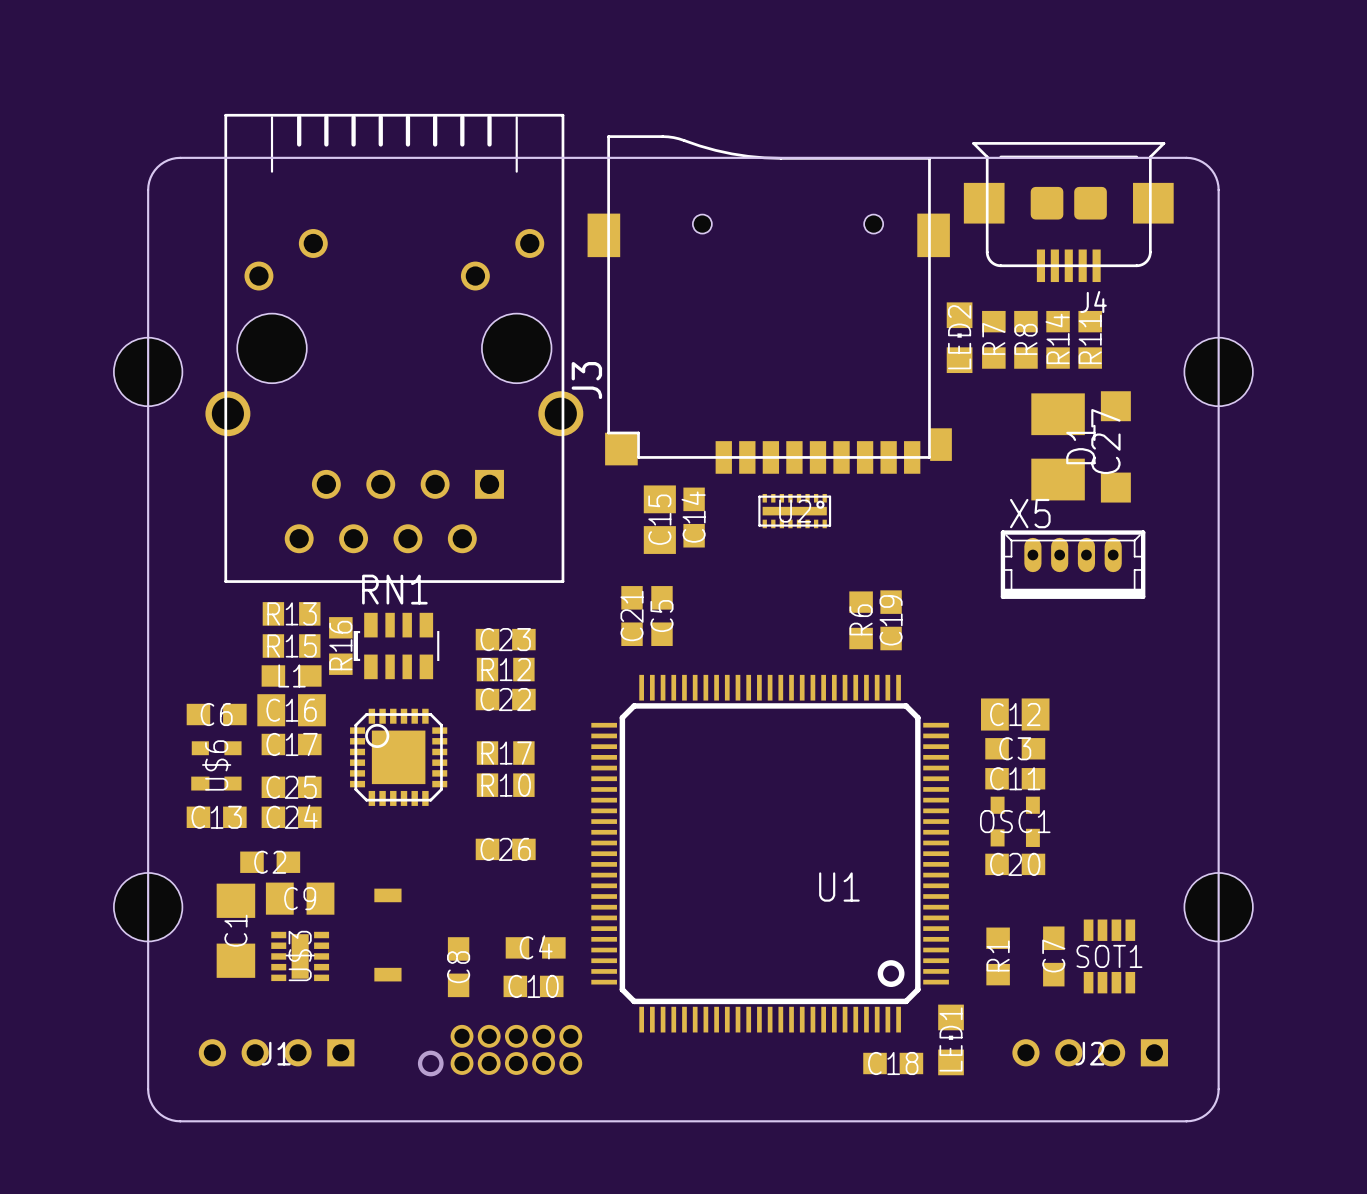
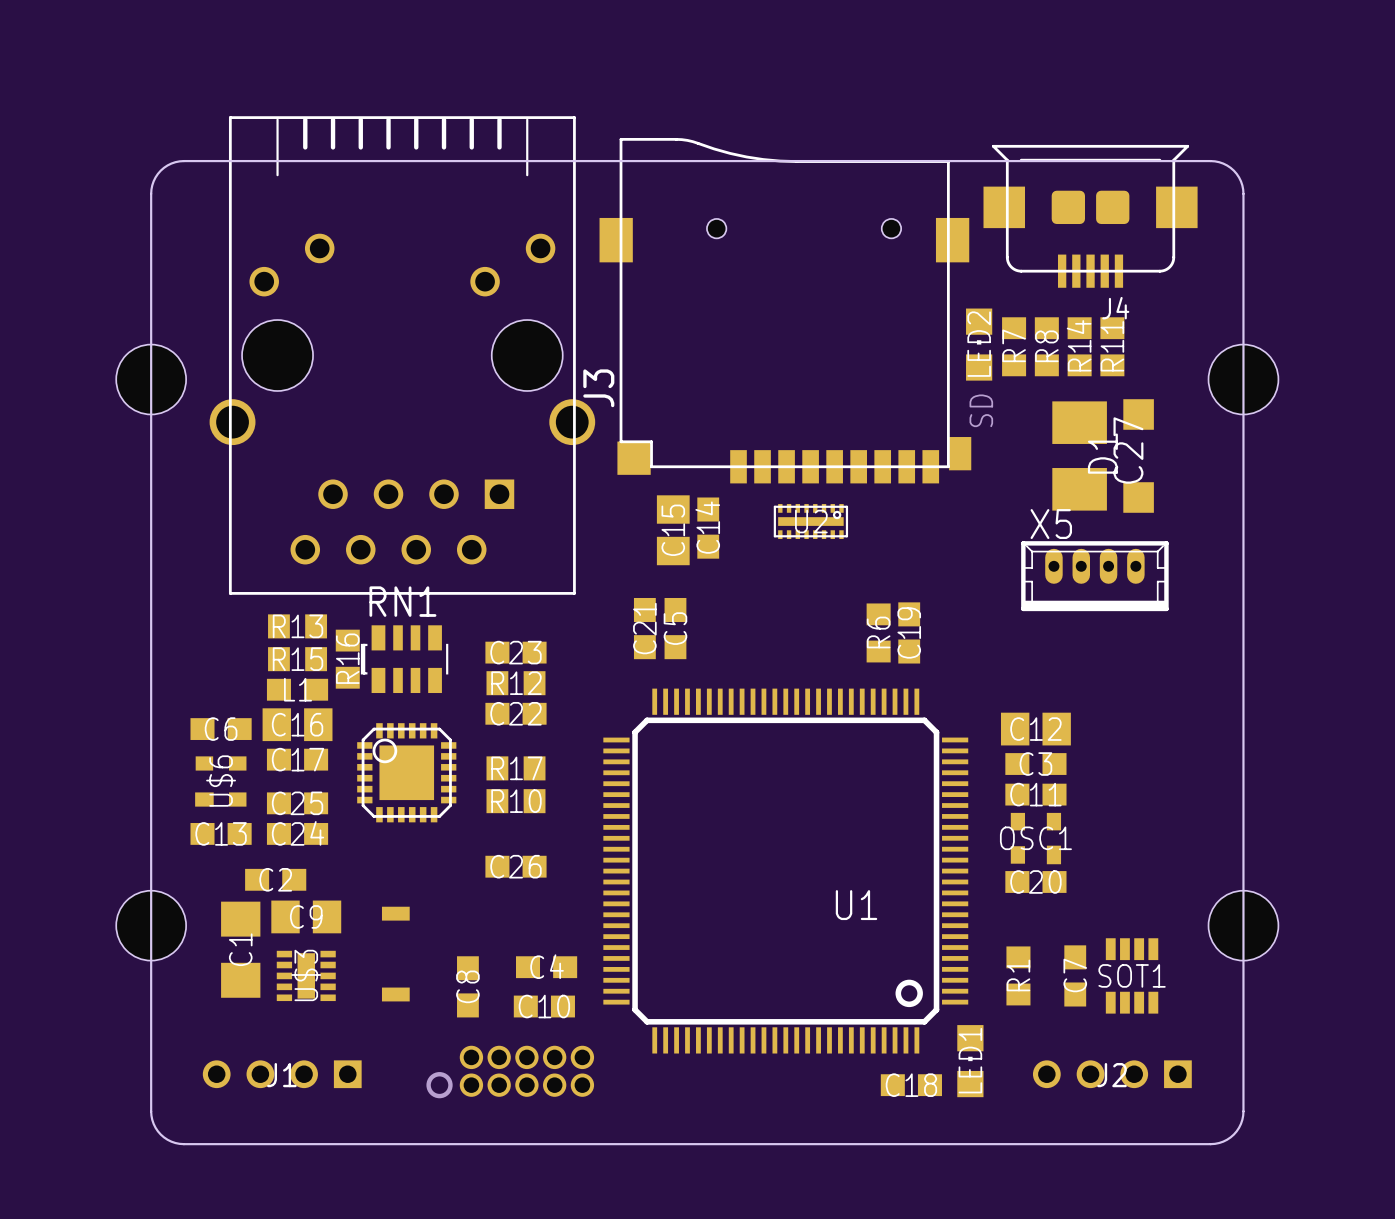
text: none -> SD (981, 410)

